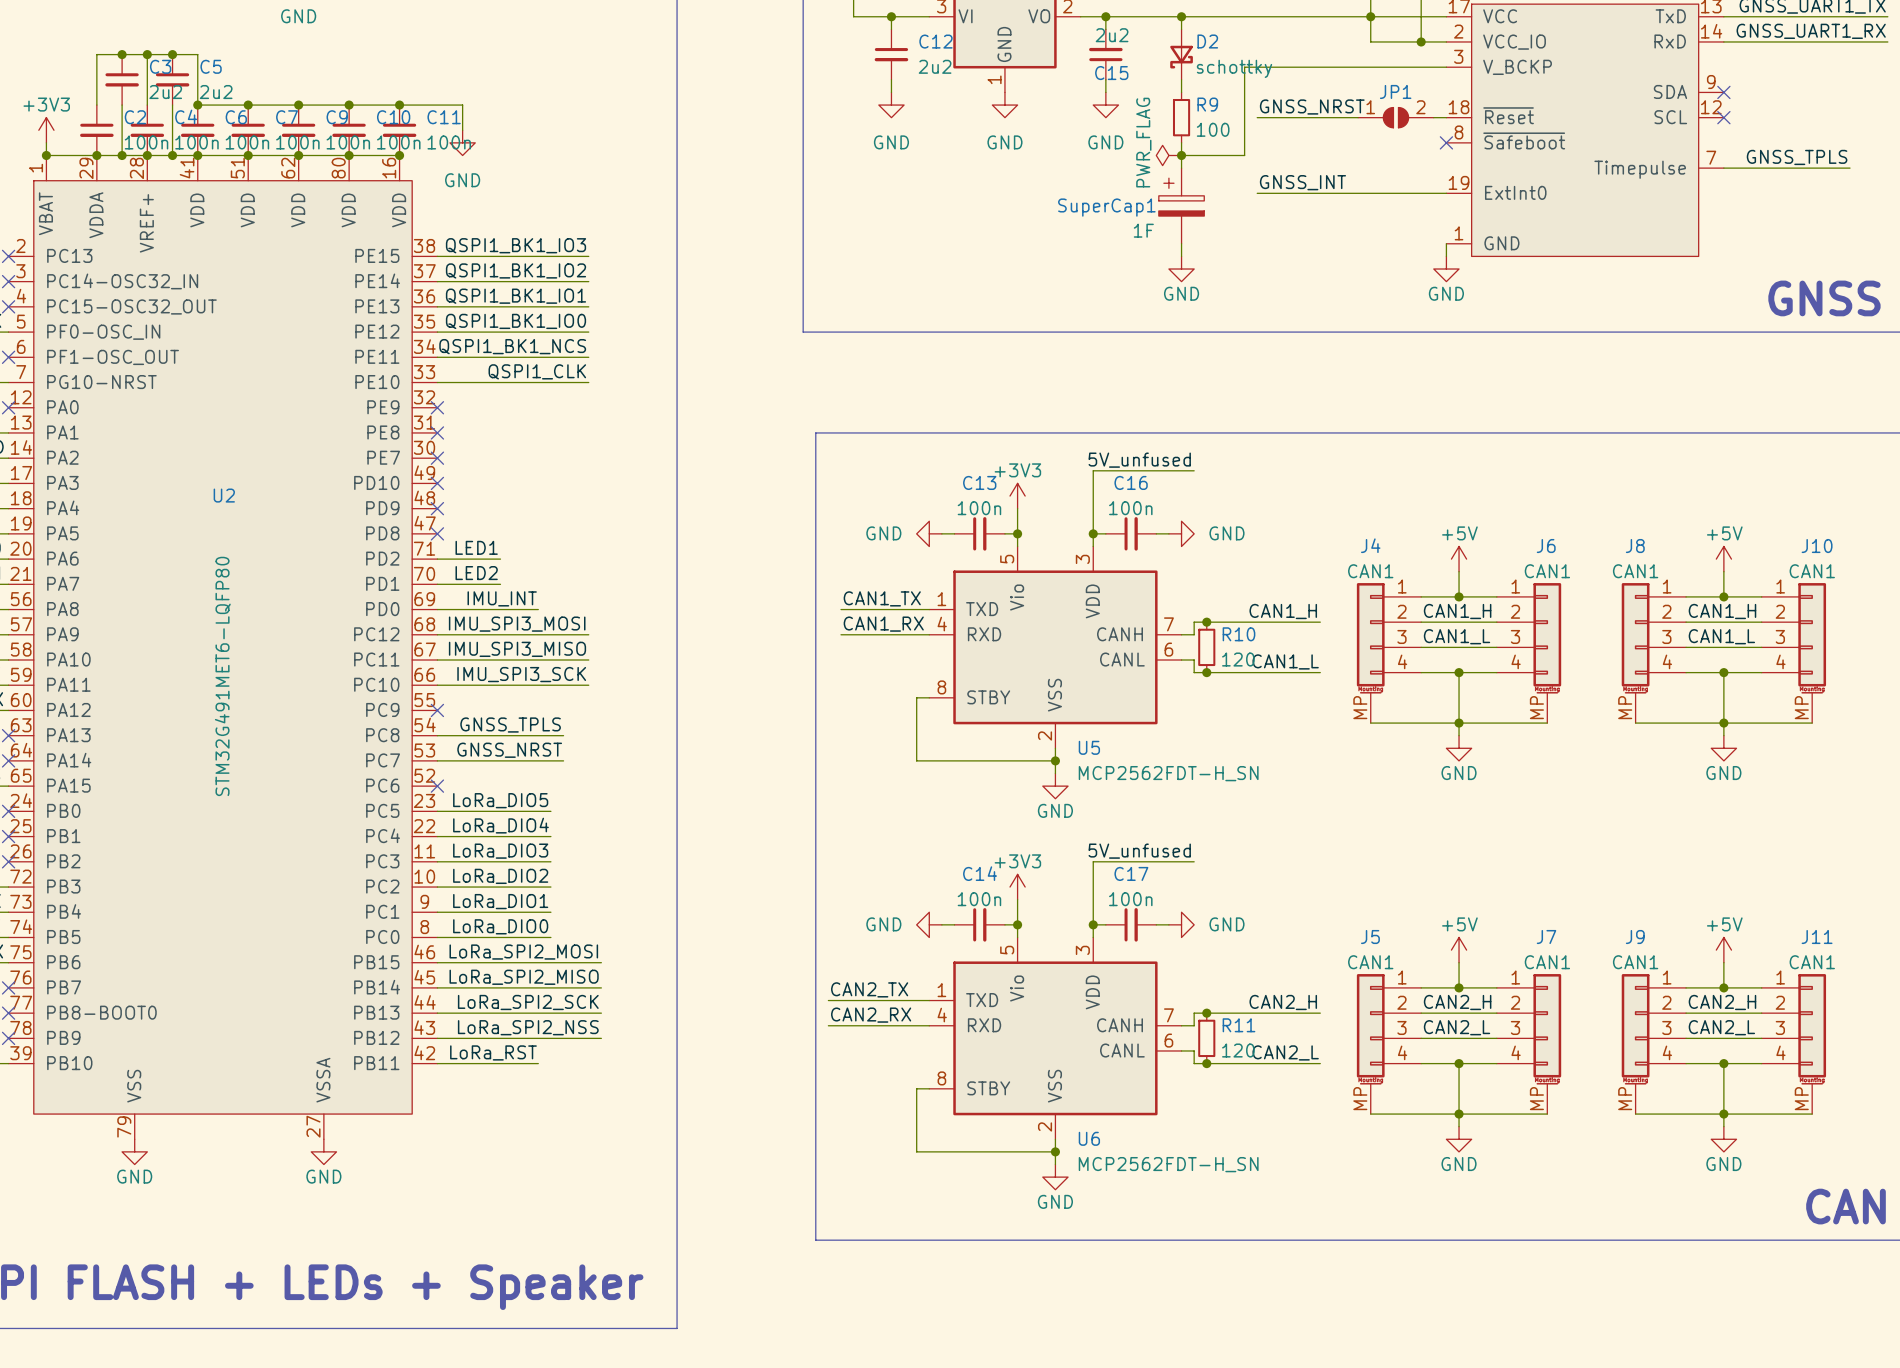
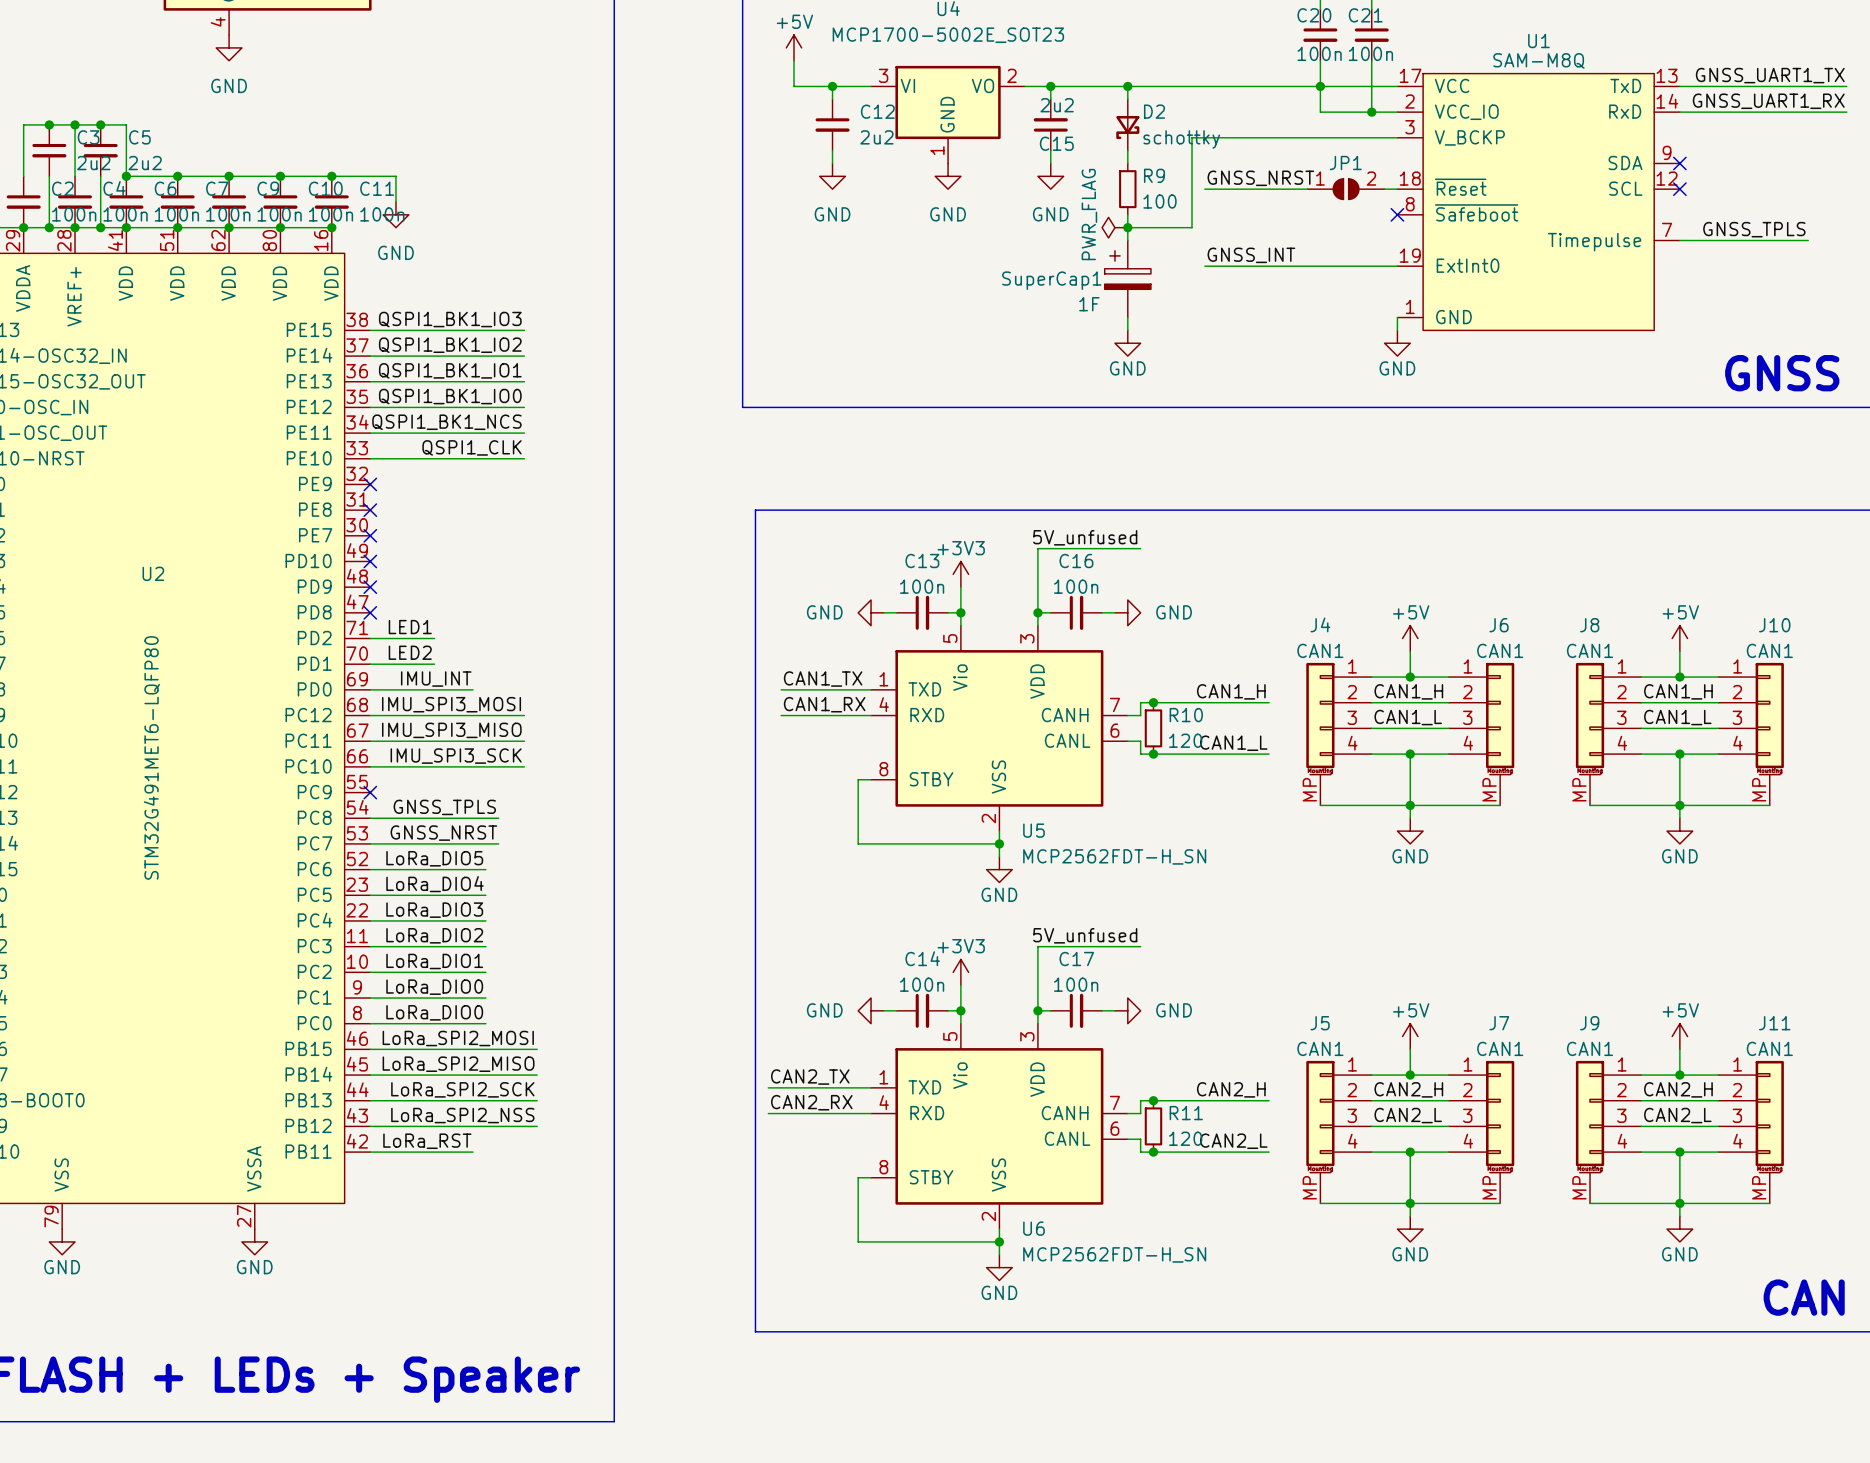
label: none -> LoRa_DIO5 (434, 858)
wire: none -> (370, 869) (485, 869)
no-connect mark: (437, 786) -> none
label: LoRa_DIO5 (500, 800) -> LoRa_DIO4 (435, 884)
label: LoRa_DIO4 (500, 825) -> LoRa_DIO3 (434, 910)
label: LoRa_DIO3 (500, 851) -> LoRa_DIO2 (434, 935)
label: LoRa_DIO2 (500, 876) -> LoRa_DIO1 (434, 961)
label: LoRa_DIO1 (500, 901) -> LoRa_DIO0 (434, 987)

